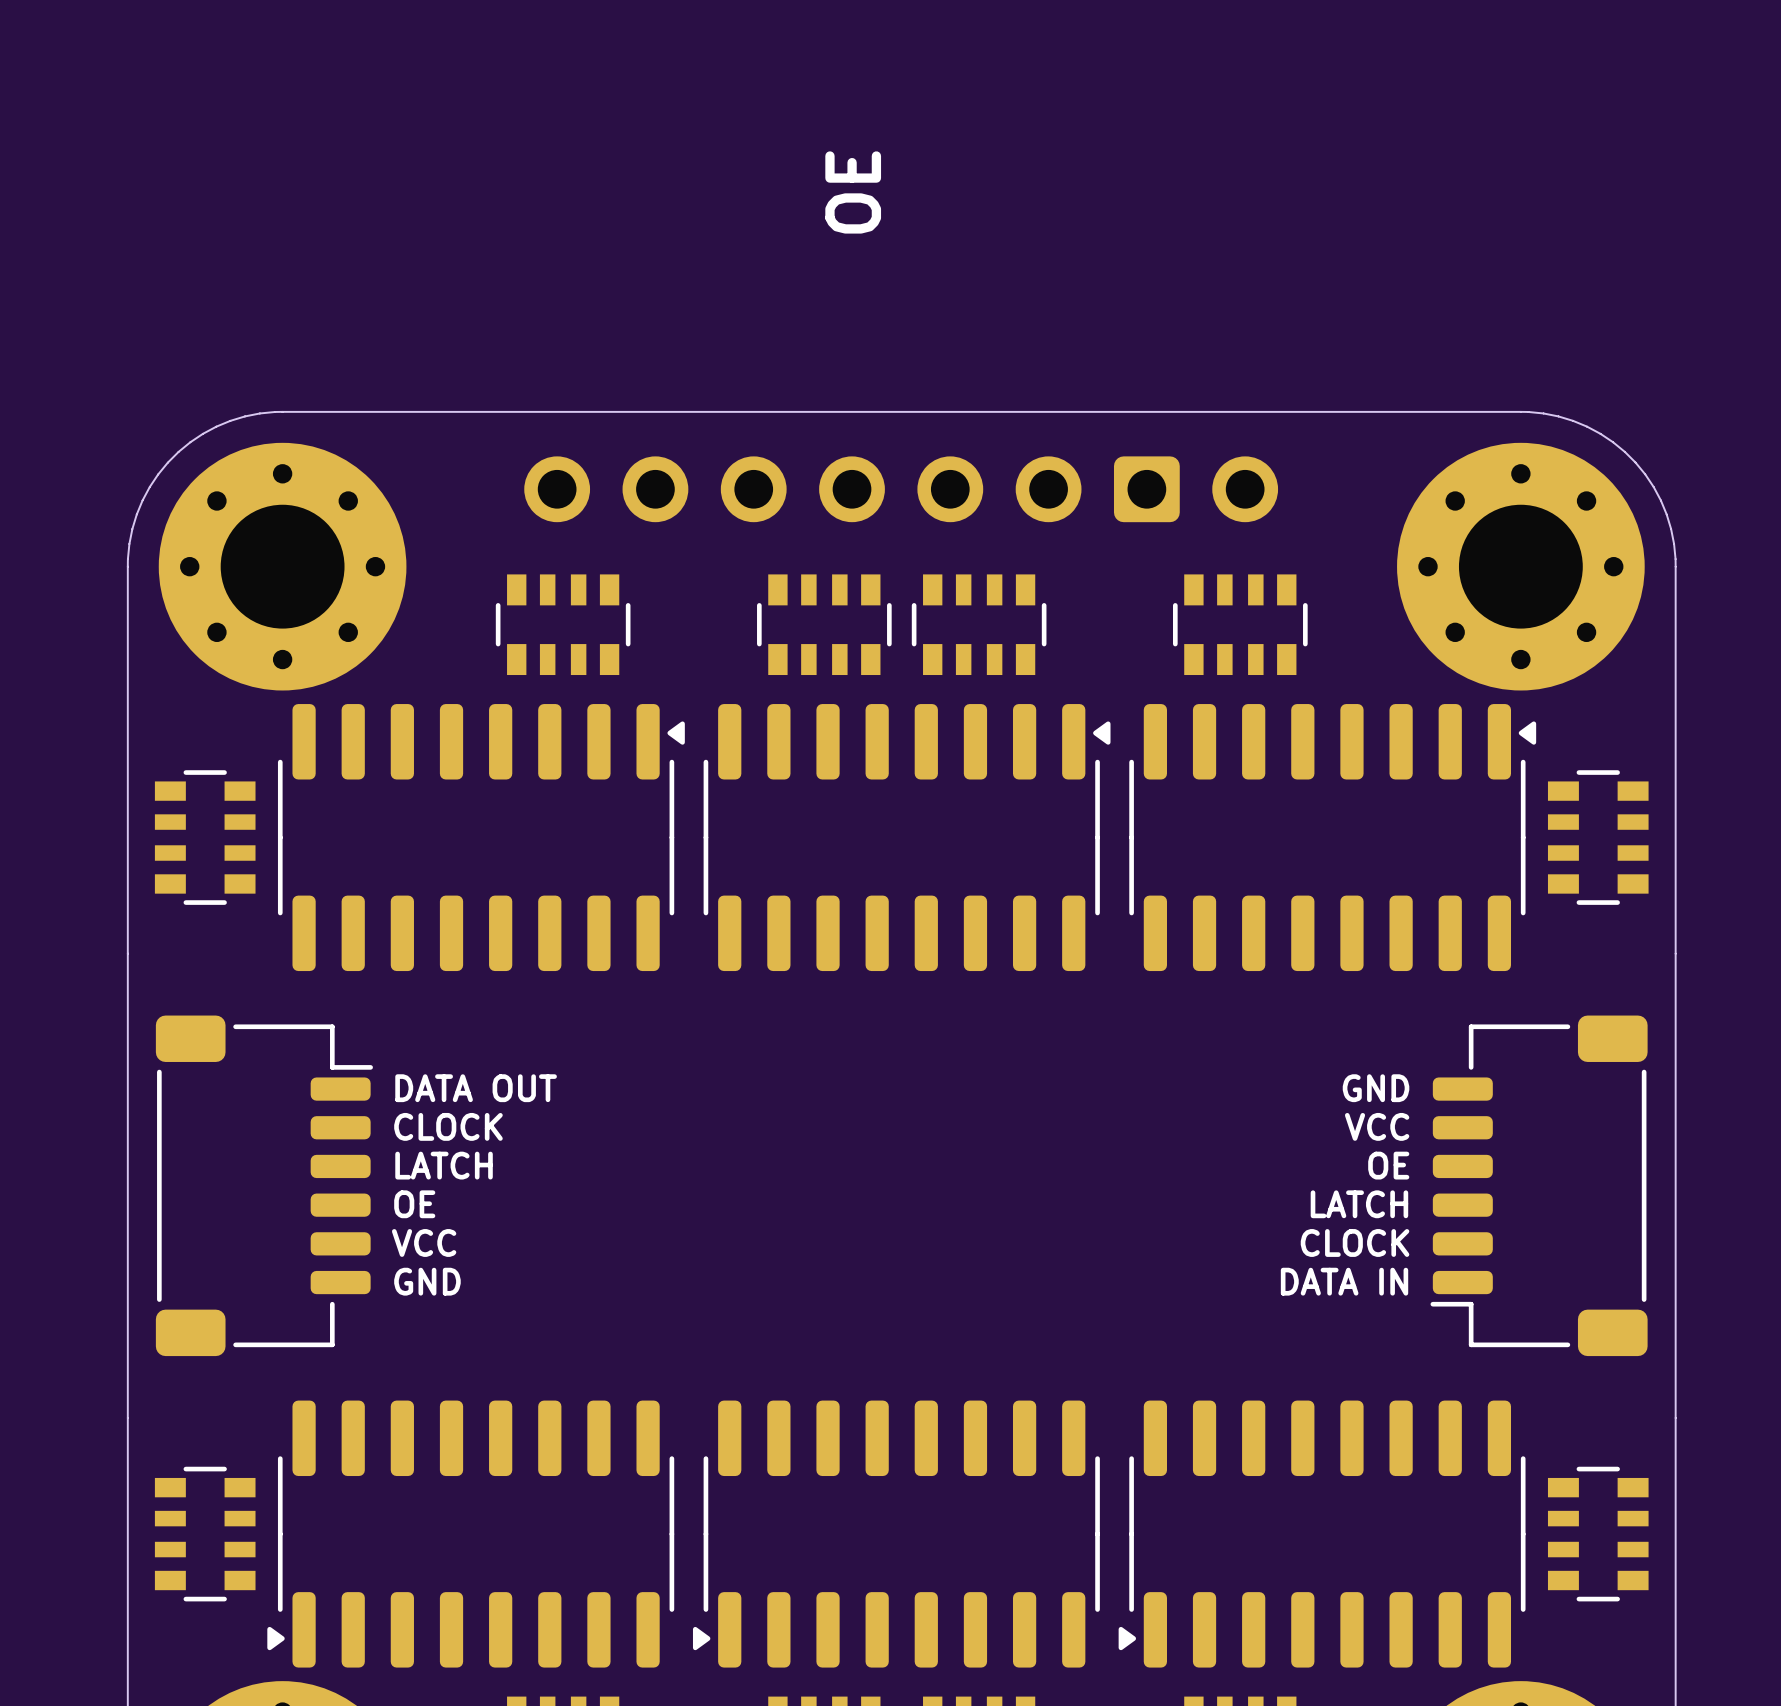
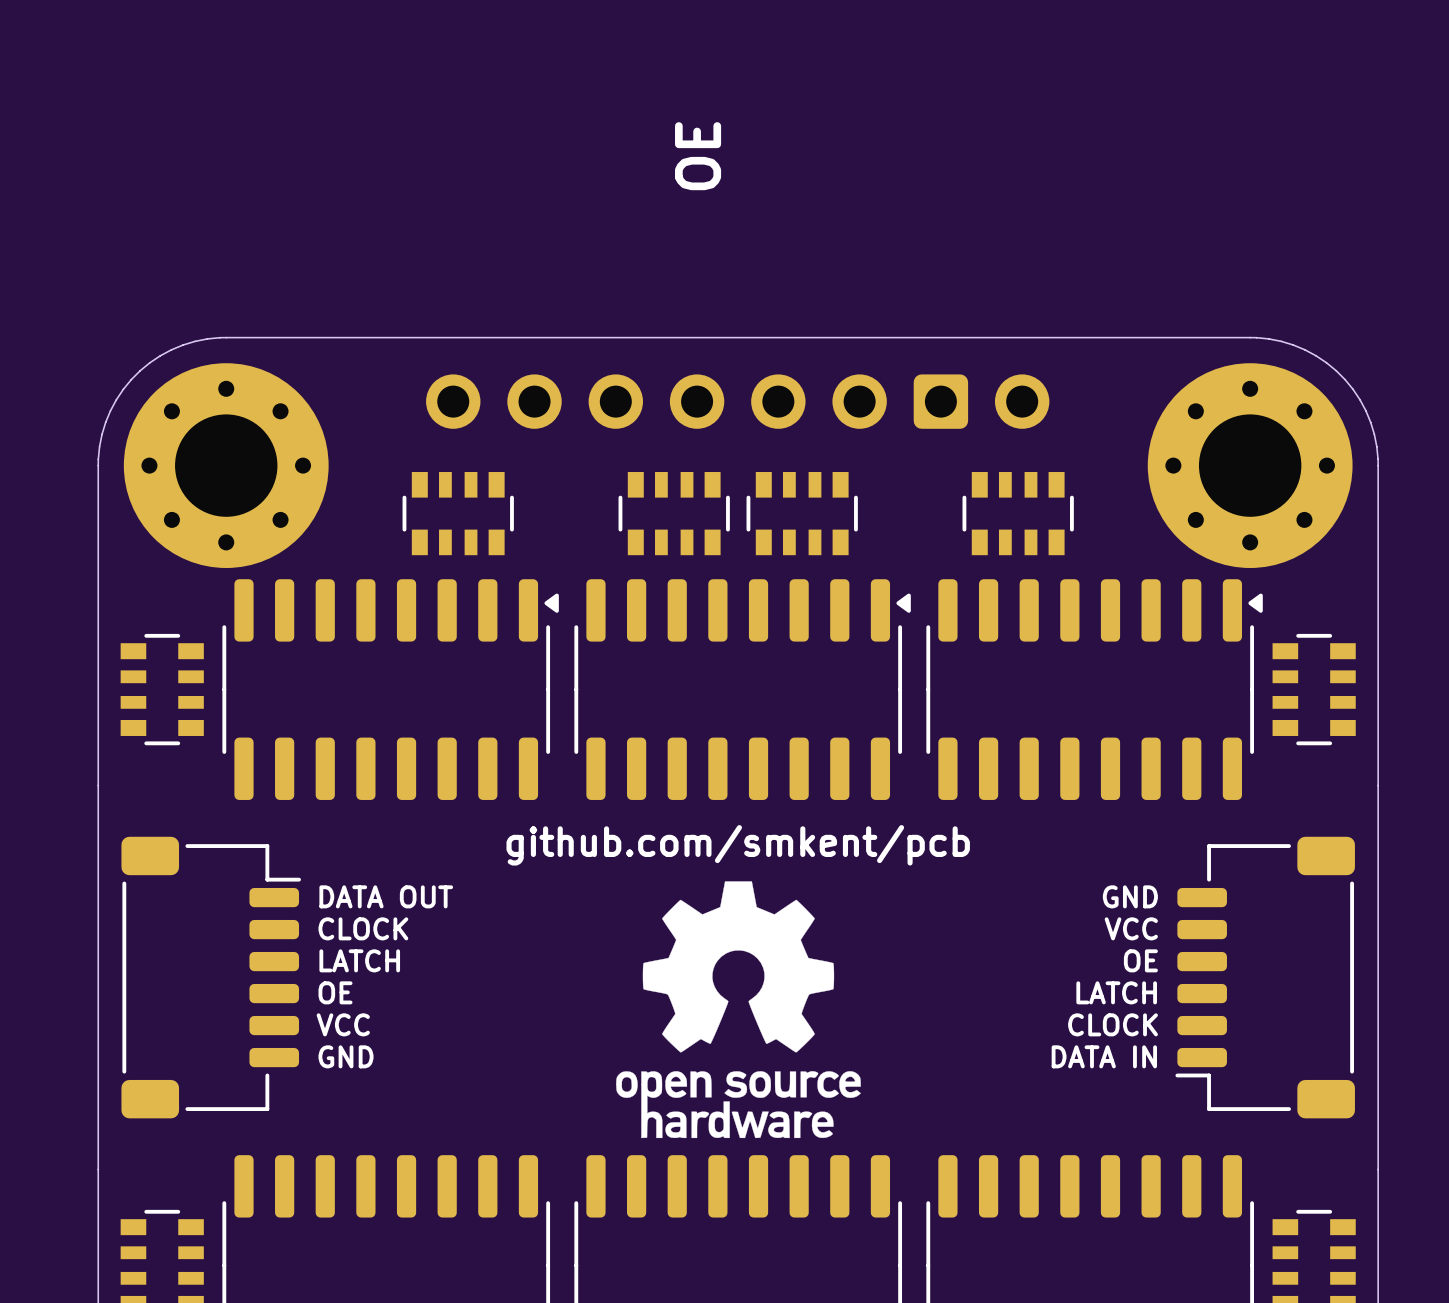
text: none -> github.com/smkent/pcb (738, 845)
drawing: none -> [616, 881, 861, 1139]

